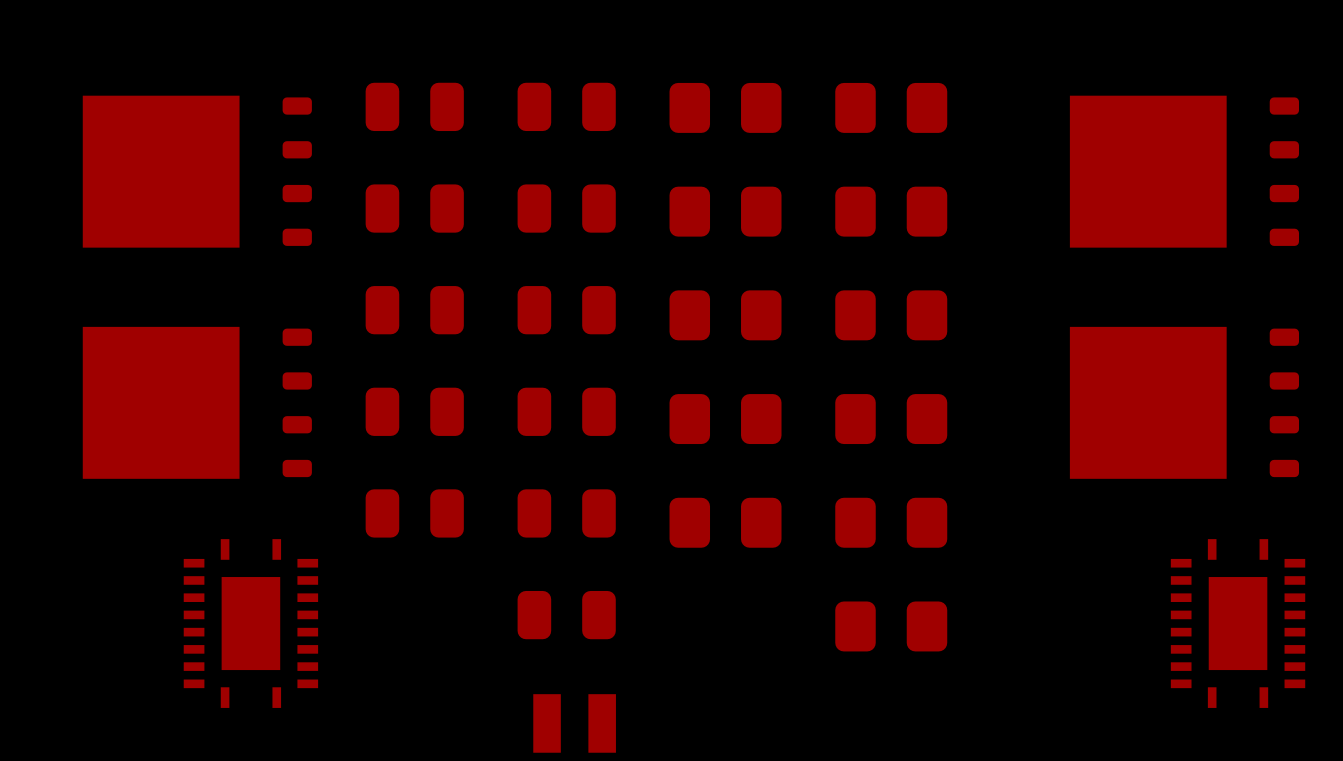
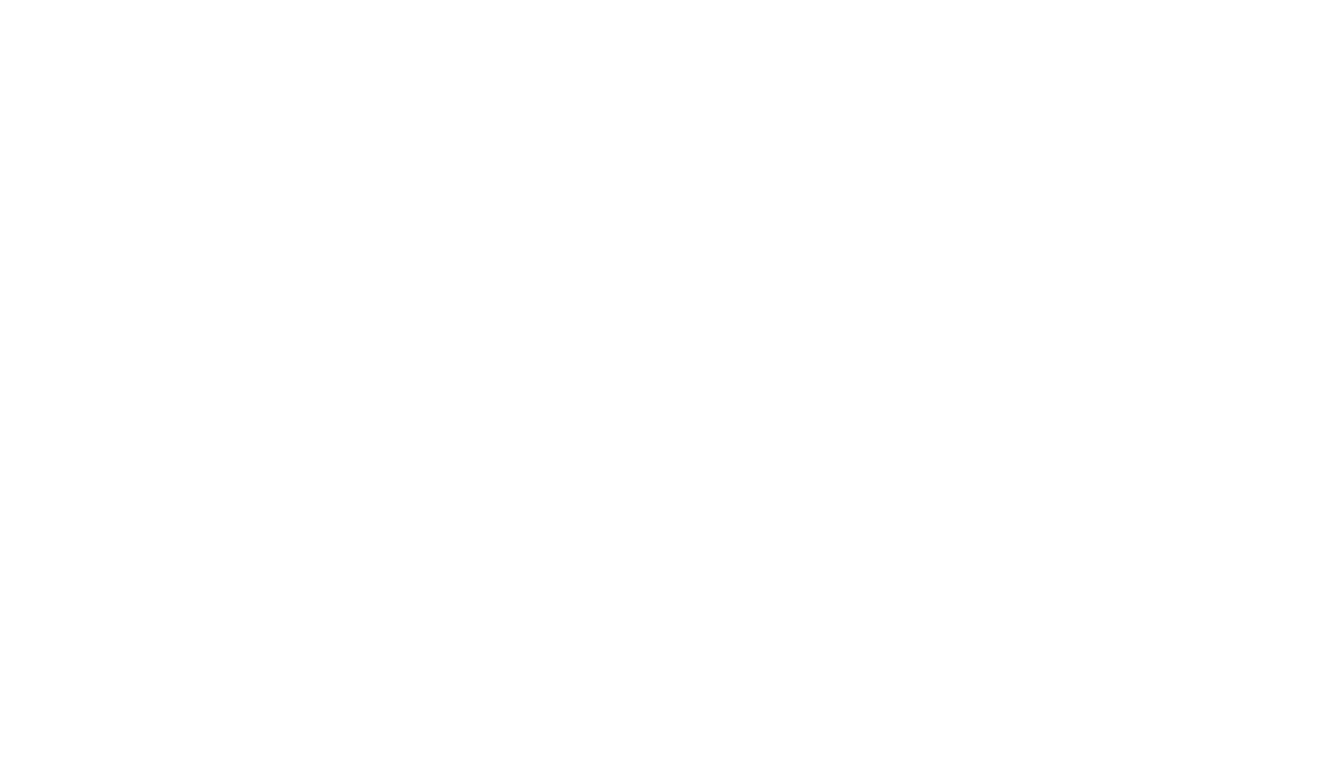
part: (414, 106) -> none
part: (566, 106) -> none
part: (725, 107) -> none
part: (891, 107) -> none
part: (197, 171) -> none
part: (1184, 171) -> none
part: (414, 208) -> none
part: (566, 208) -> none
part: (725, 211) -> none
part: (891, 211) -> none
part: (414, 310) -> none
part: (566, 310) -> none
part: (725, 315) -> none
part: (891, 315) -> none
part: (197, 402) -> none
part: (1184, 402) -> none
part: (414, 411) -> none
part: (566, 411) -> none
part: (725, 419) -> none
part: (891, 419) -> none
part: (414, 513) -> none
part: (566, 513) -> none
part: (725, 522) -> none
part: (891, 522) -> none
part: (566, 615) -> none
part: (250, 623) -> none
part: (1238, 623) -> none
part: (891, 626) -> none
part: (574, 723) -> none

